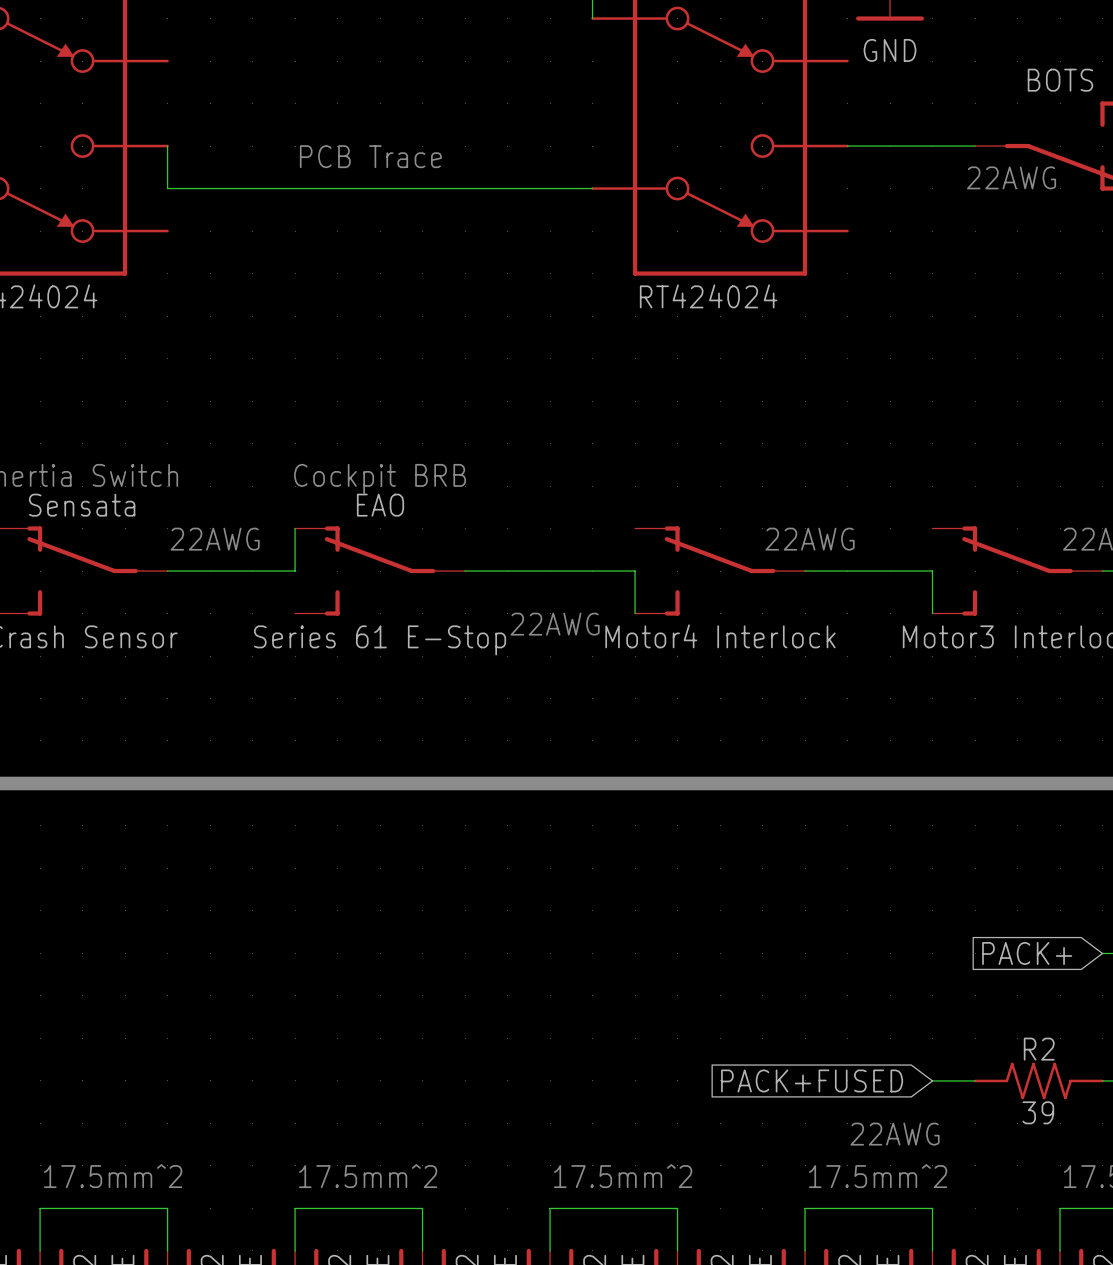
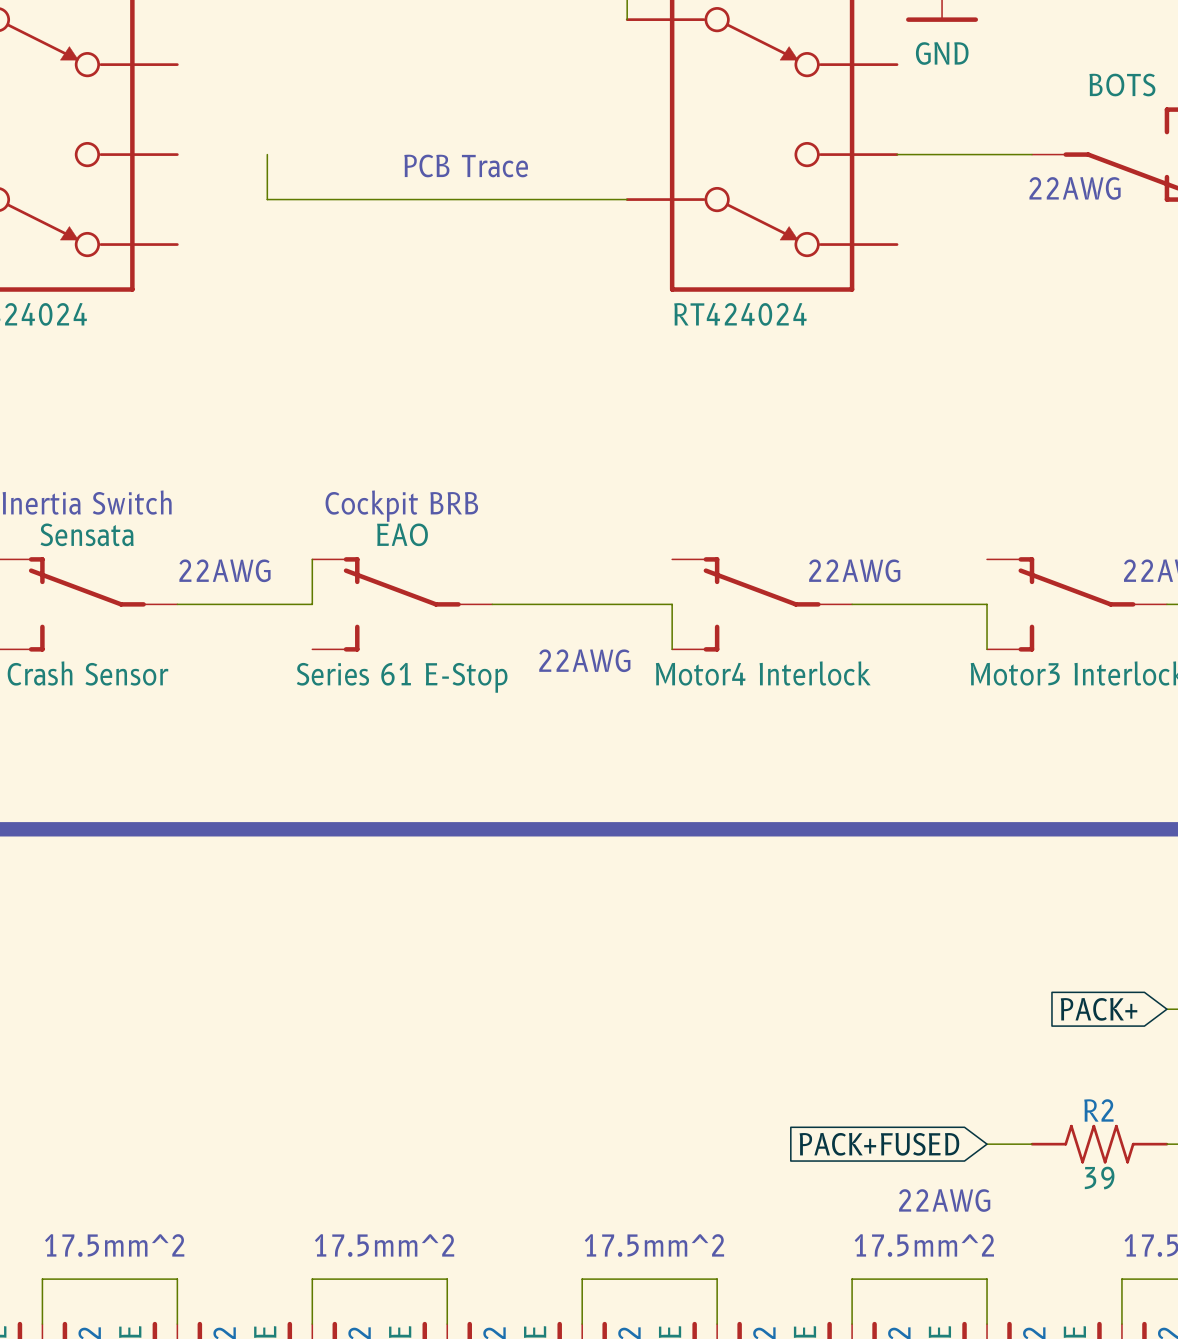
wire: (167, 146) (167, 188) (252, 188) -> (267, 154) (267, 199)
text position: PCB Trace (370, 156) -> PCB Trace (466, 165)

